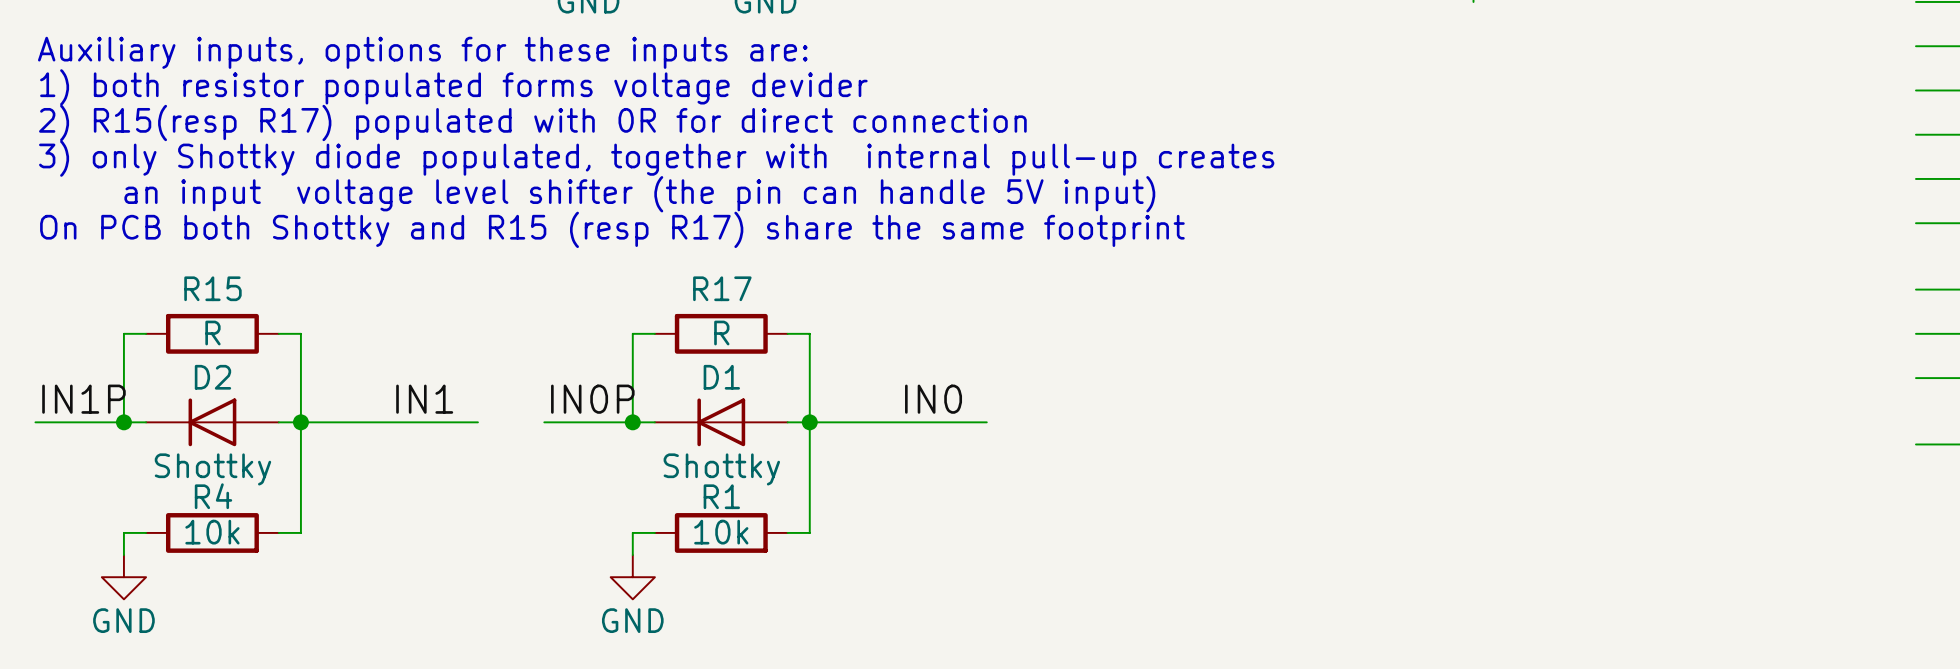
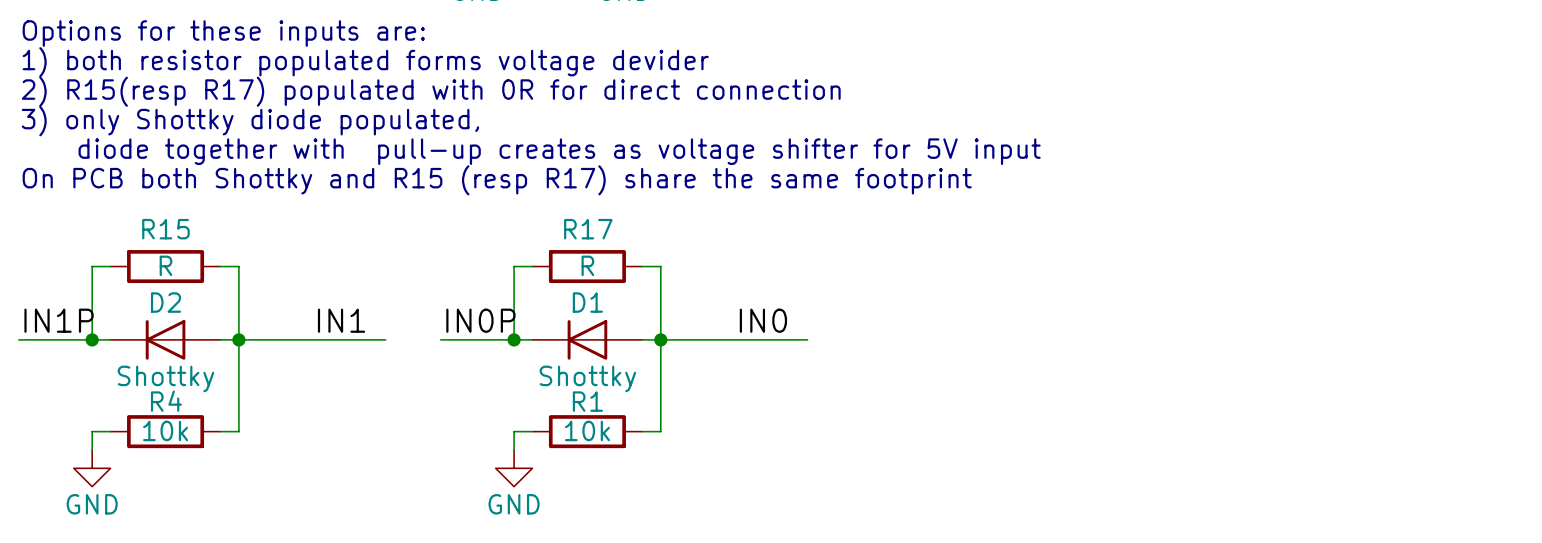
text: Auxiliary inputs, options for these inputs are: (422, 52) -> Options for these inputs are: (223, 33)
text: 3) only Shottky diode populated, together with internal pull-up creates (656, 158) -> 3) only Shottky diode populated, (250, 121)
text: an input voltage level shifter (the pin can handle 5V input) (639, 194) -> diode together with pull-up creates as voltage shifter for 5V input (559, 151)

